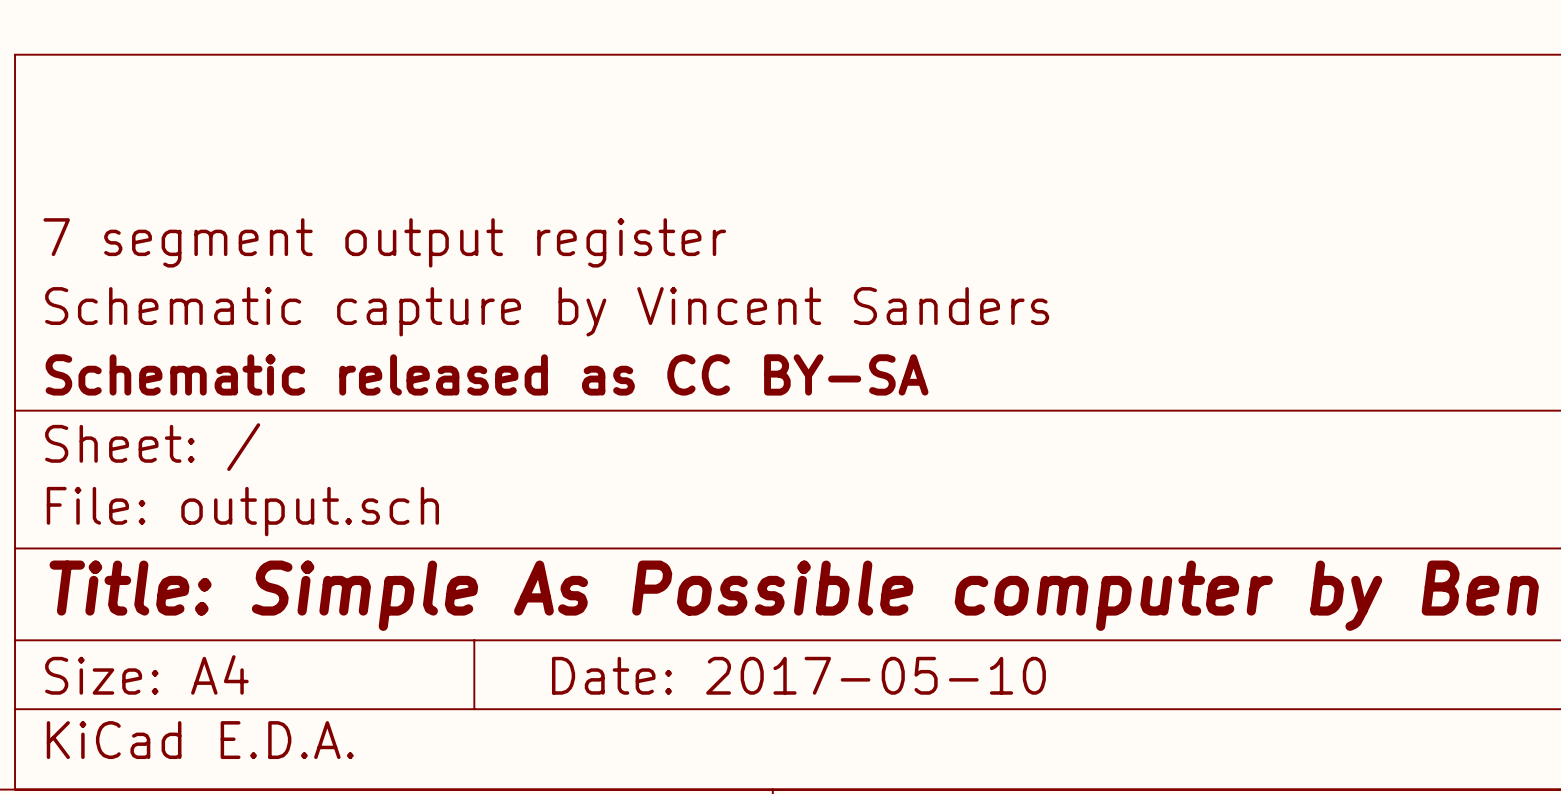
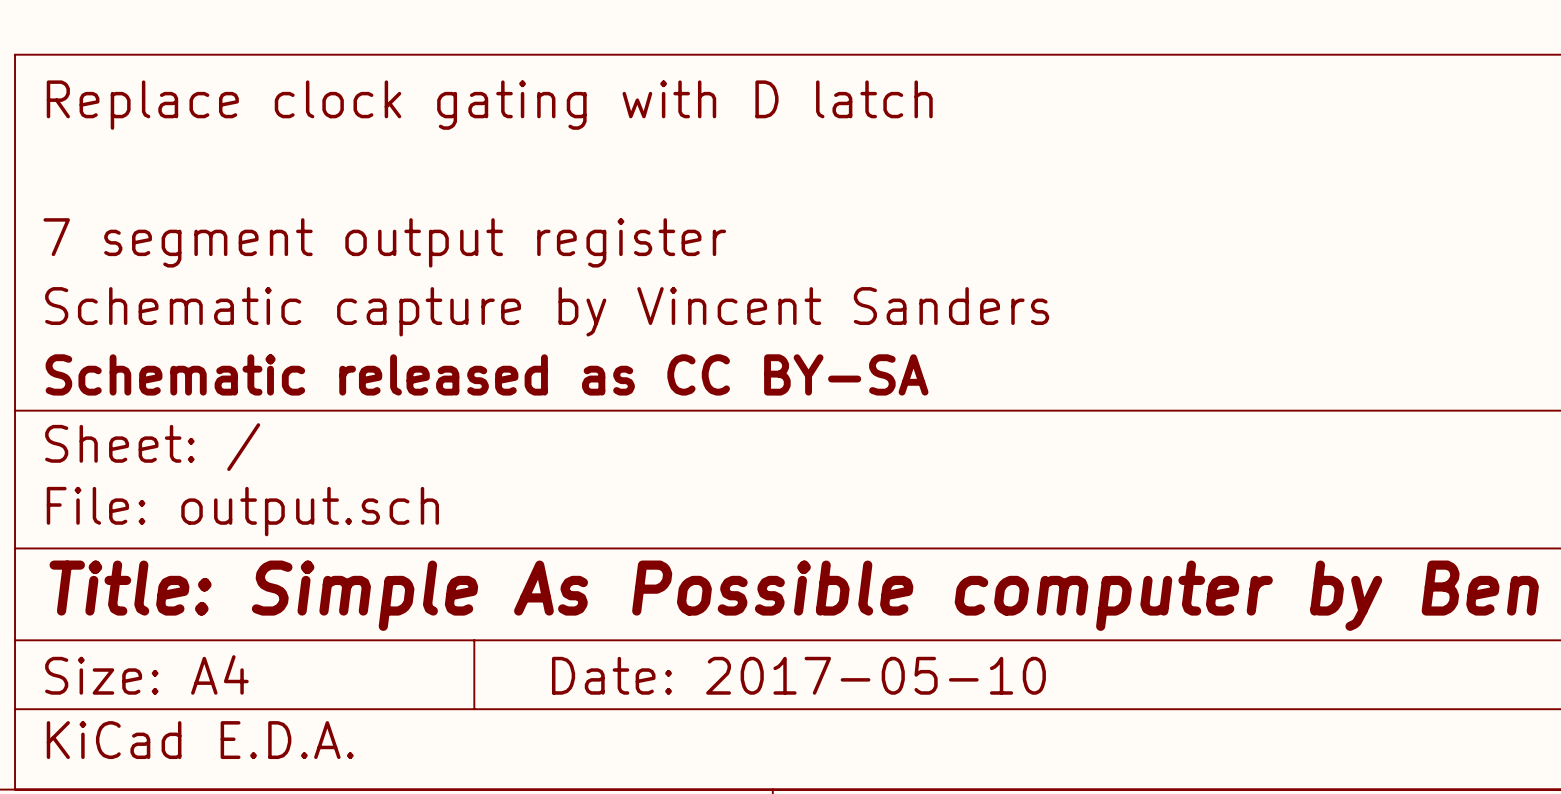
title block: none -> Replace clock gating with D latch (489, 105)

